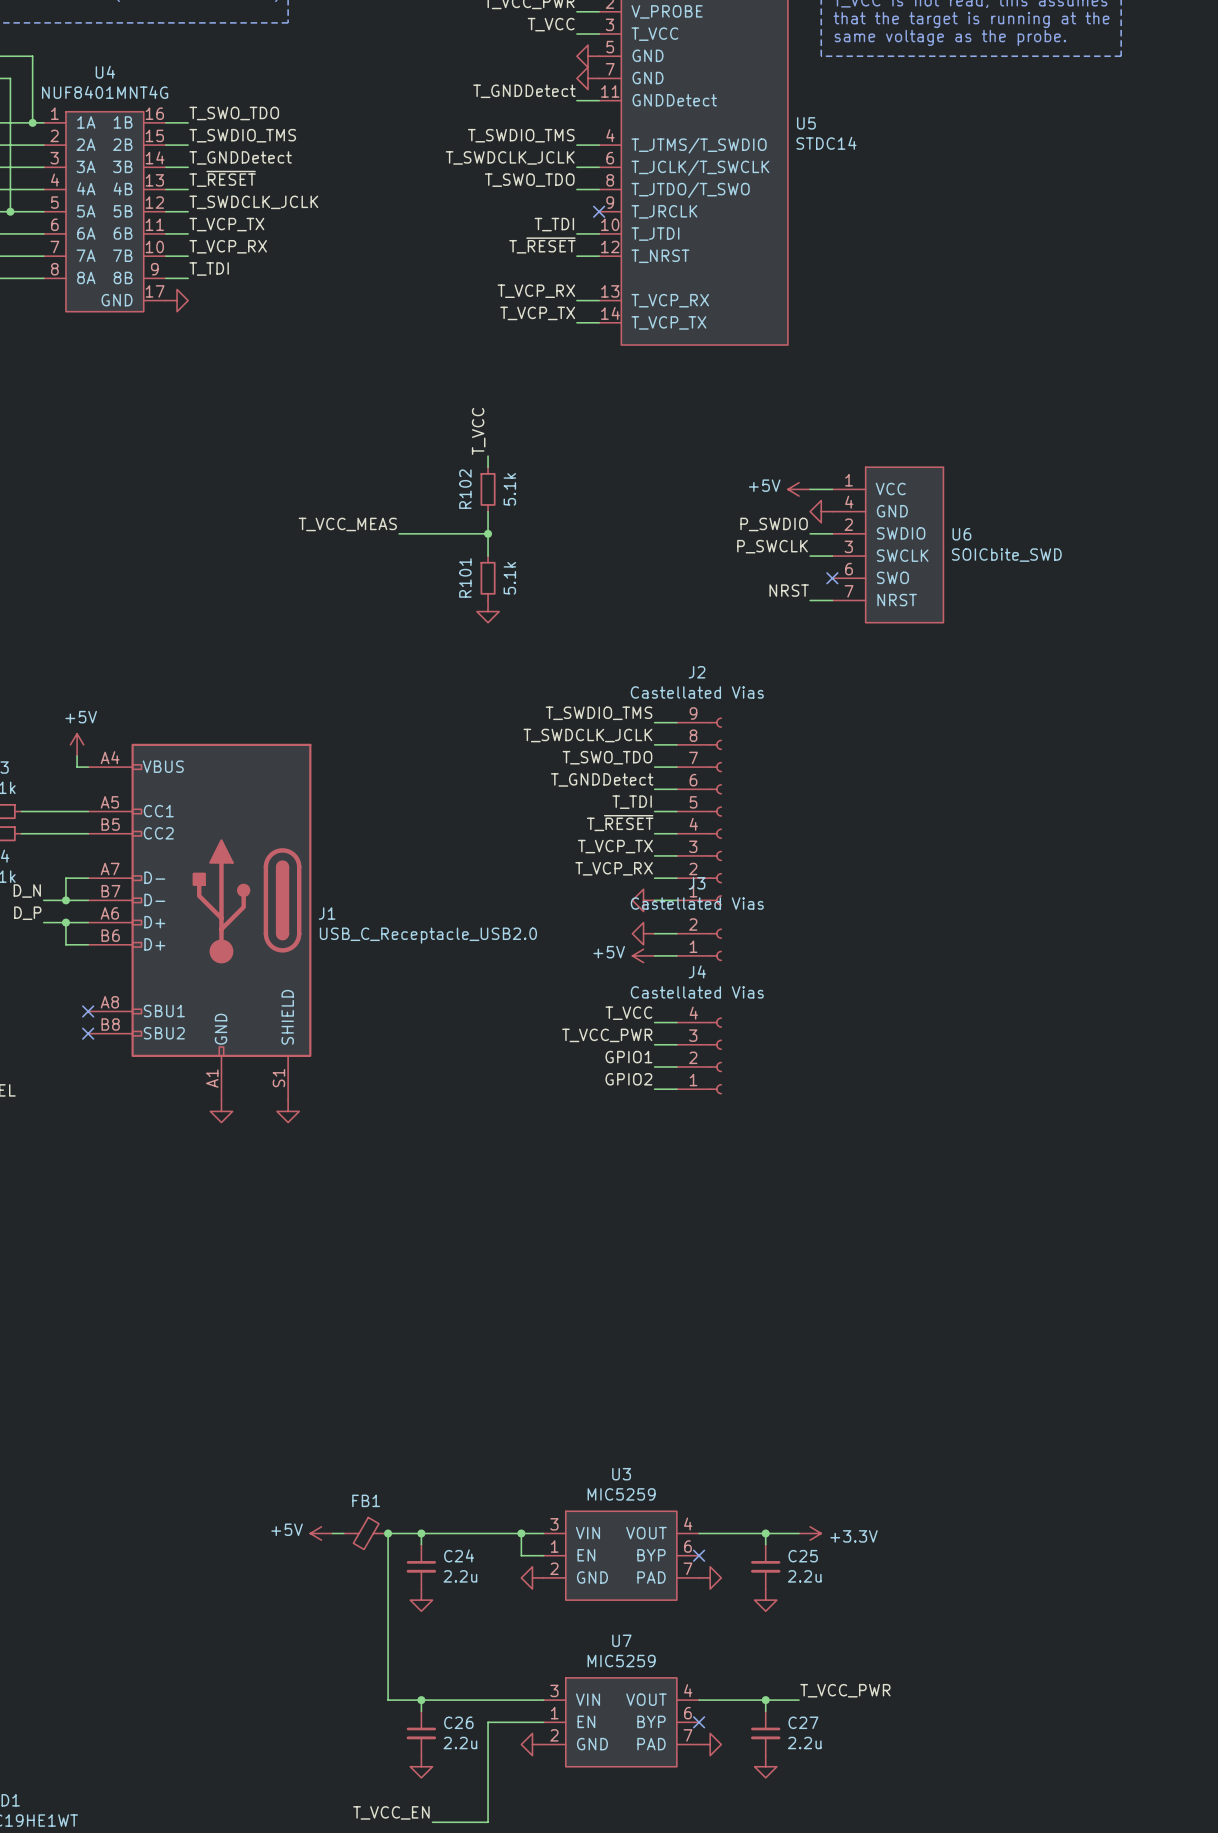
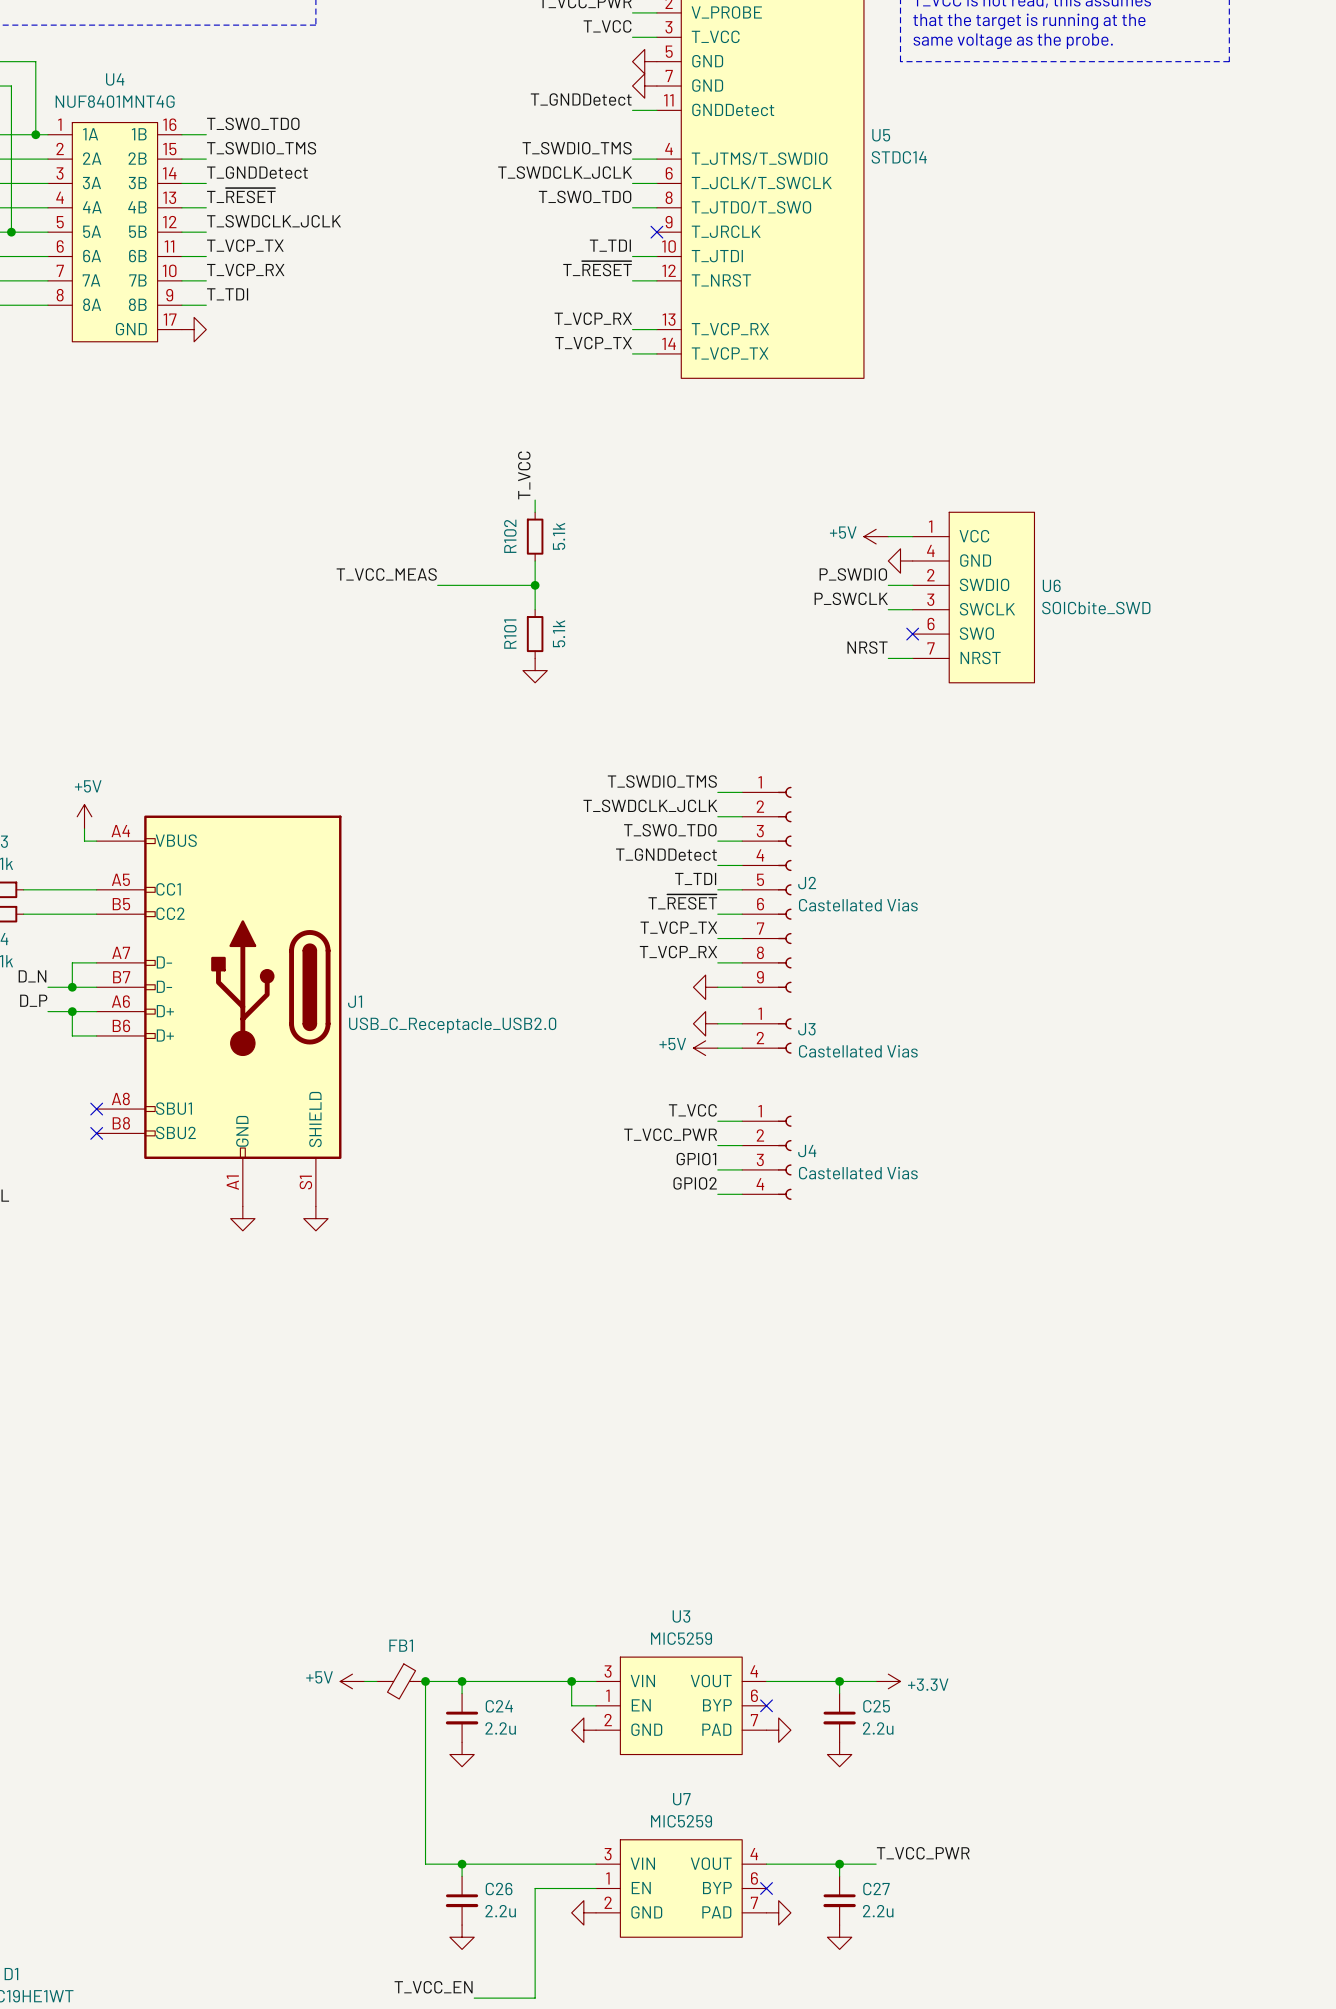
J2 name position: J2 (697, 672) -> J2 (807, 883)
J2 value position: Castellated Vias (697, 692) -> Castellated Vias (858, 905)
J2 flip: as is (715, 811) -> up-down (784, 889)
J3 name position: J3 (697, 883) -> J3 (806, 1029)
J3 value position: Castellated Vias (697, 903) -> Castellated Vias (858, 1051)
J3 flip: as is (715, 944) -> up-down (784, 1035)
J4 name position: J4 (697, 971) -> J4 (807, 1151)
J4 value position: Castellated Vias (697, 992) -> Castellated Vias (858, 1173)
J4 flip: as is (715, 1055) -> up-down (784, 1157)

